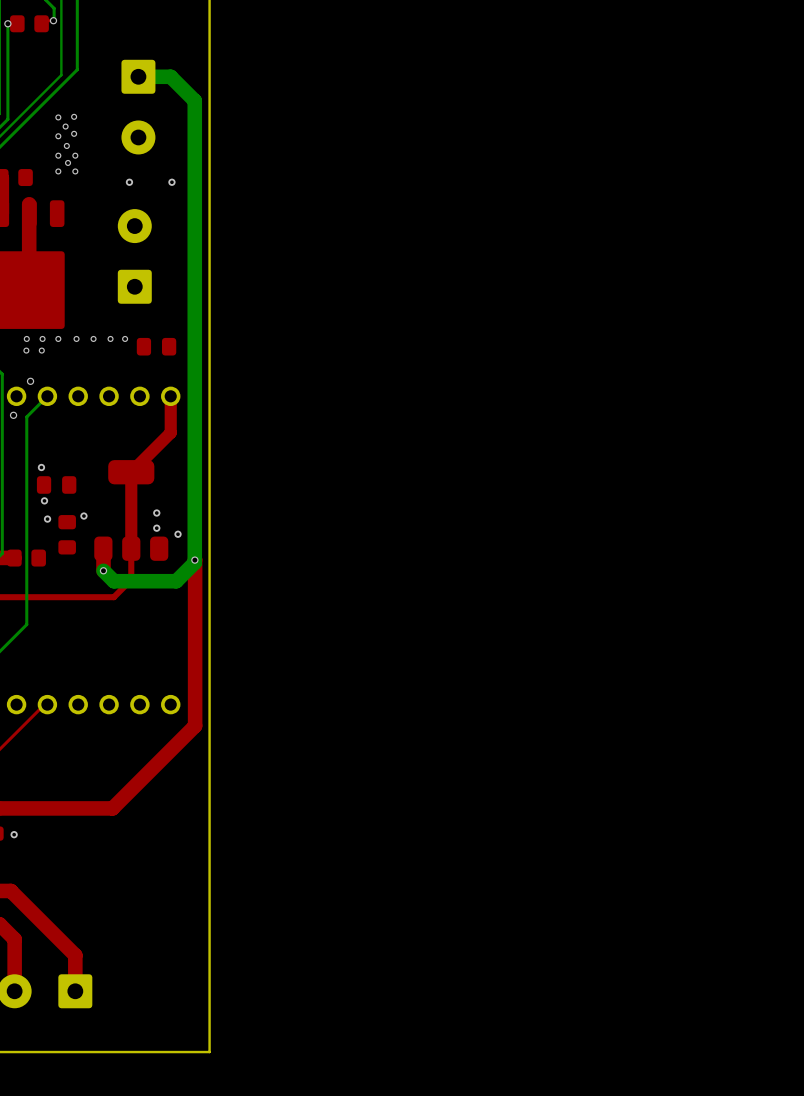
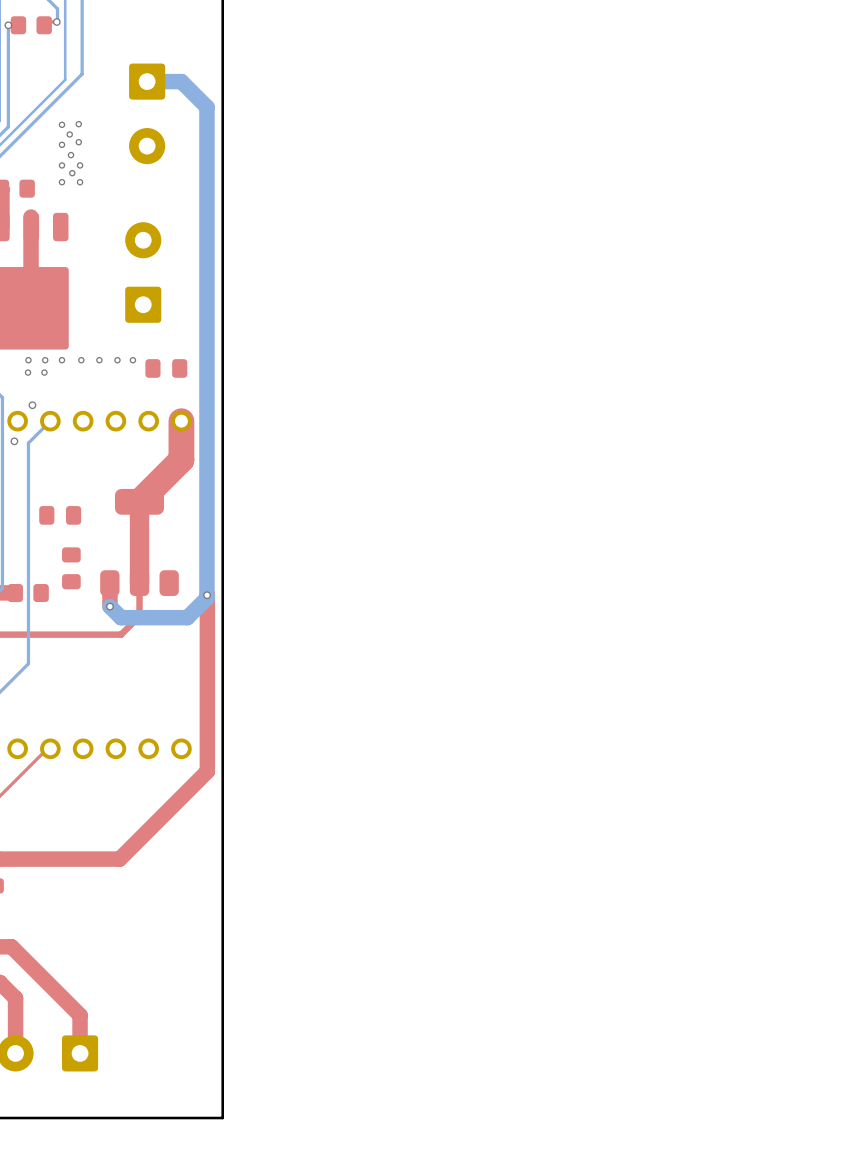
via: (129, 182) -> none
via: (171, 182) -> none
top track width: thin (170, 396) (170, 432) (131, 472) (131, 548) -> thick (181, 421) (181, 459) (139, 501) (139, 583)
via: (41, 467) -> none
via: (44, 500) -> none
via: (156, 513) -> none
via: (83, 516) -> none
via: (47, 519) -> none
via: (156, 528) -> none
via: (178, 534) -> none
via: (14, 834) -> none

